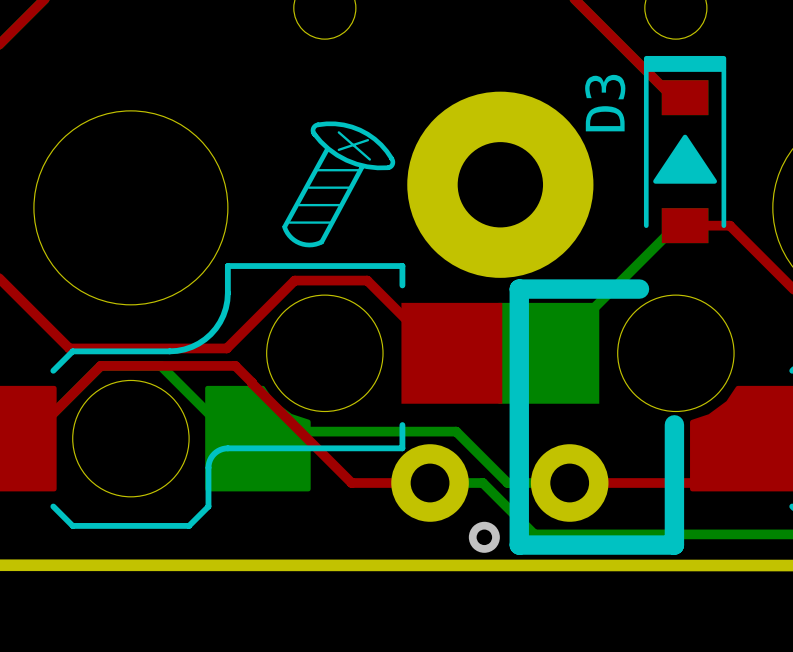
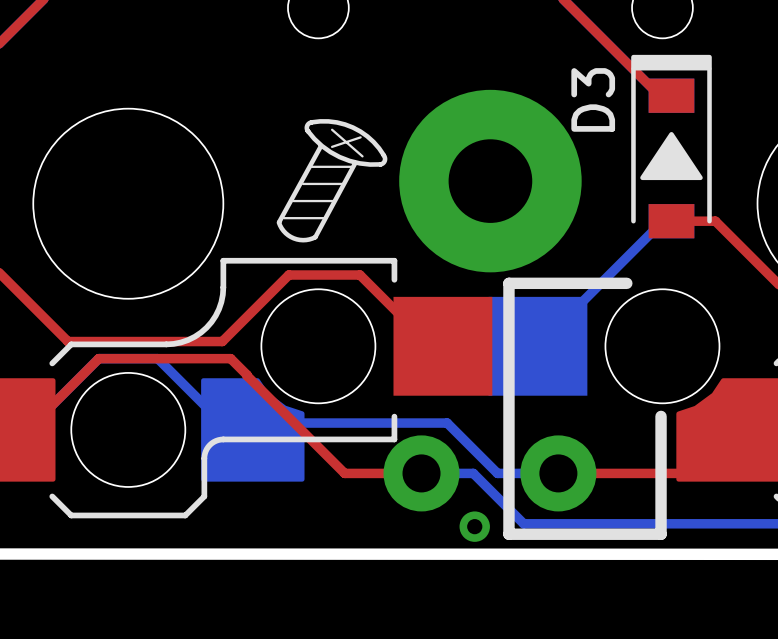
line width: thick (639, 289) (519, 289) (519, 545) (674, 545) (674, 424) -> thin (626, 283) (508, 283) (508, 534) (661, 534) (661, 416)

